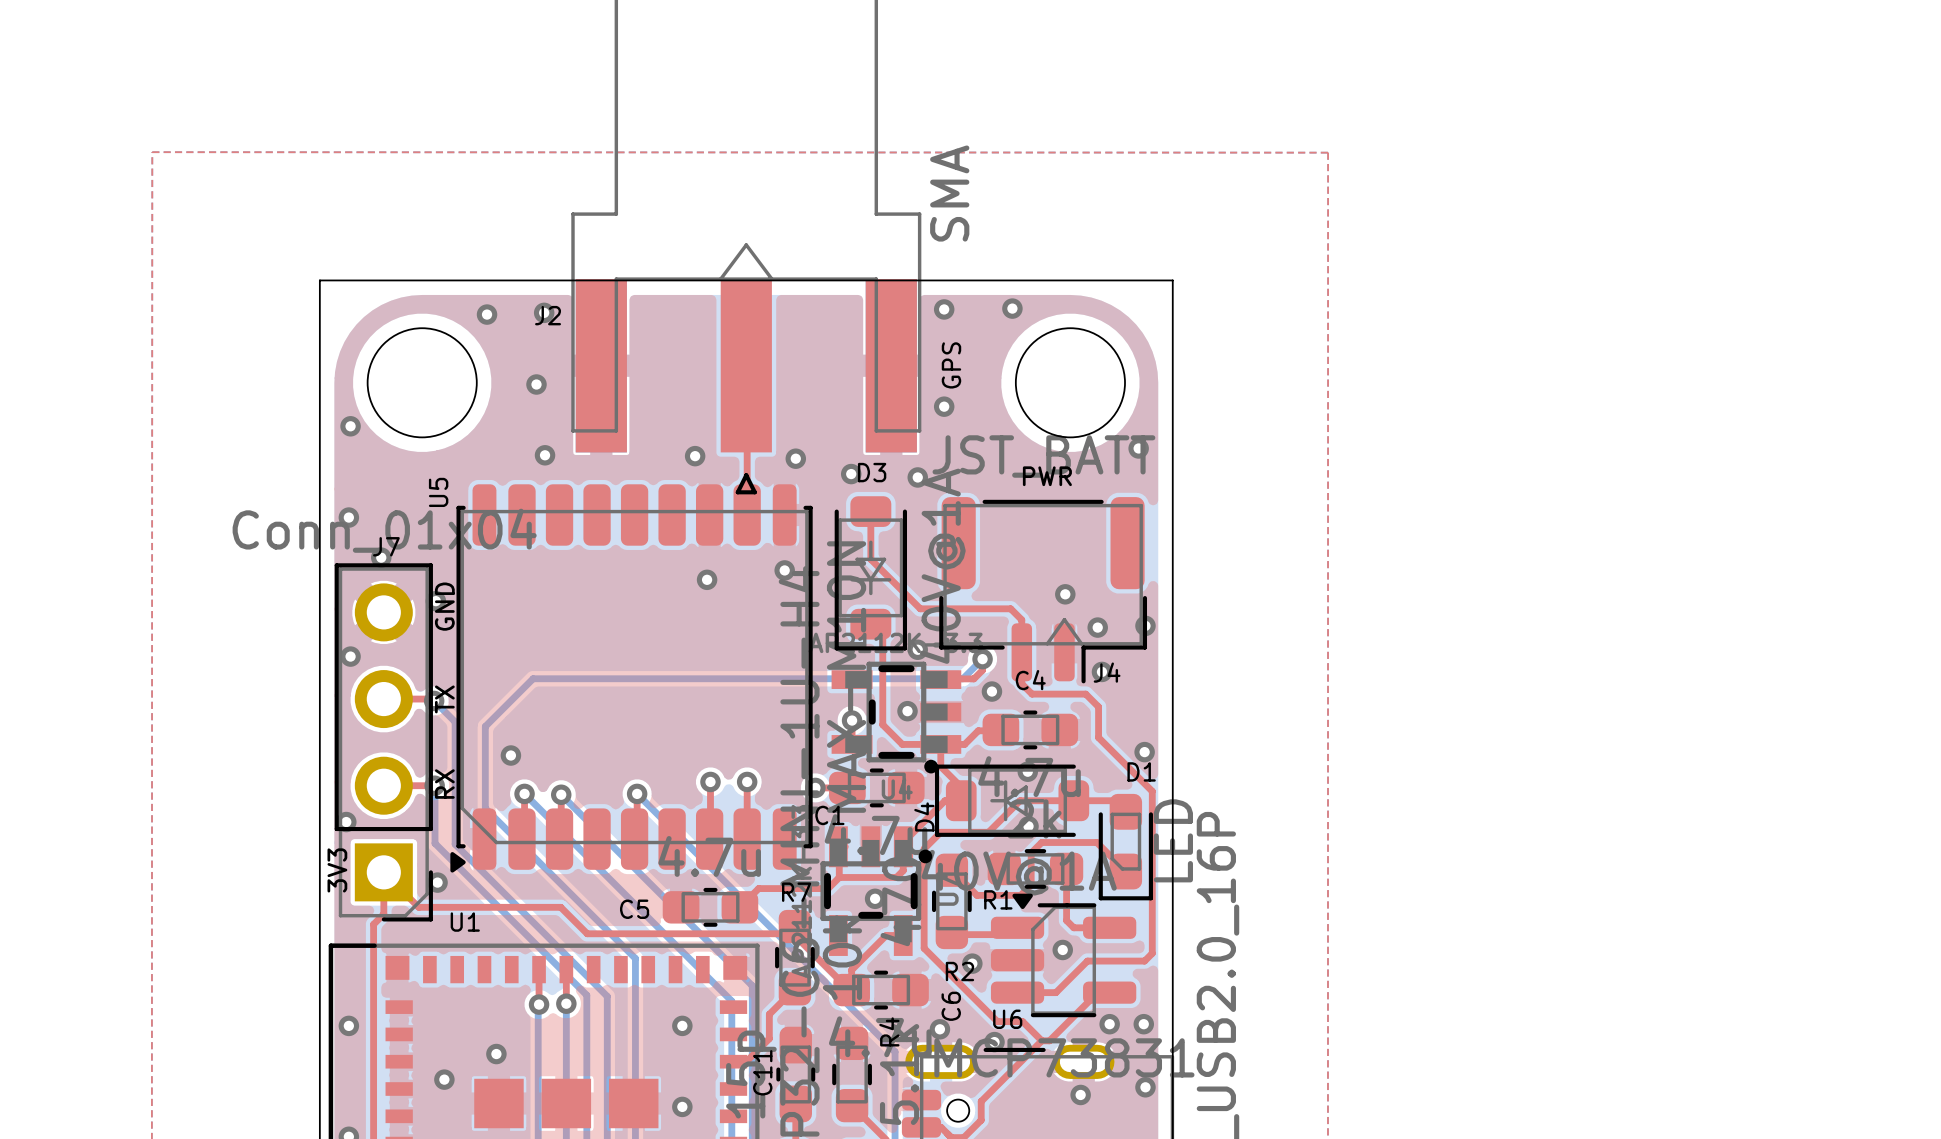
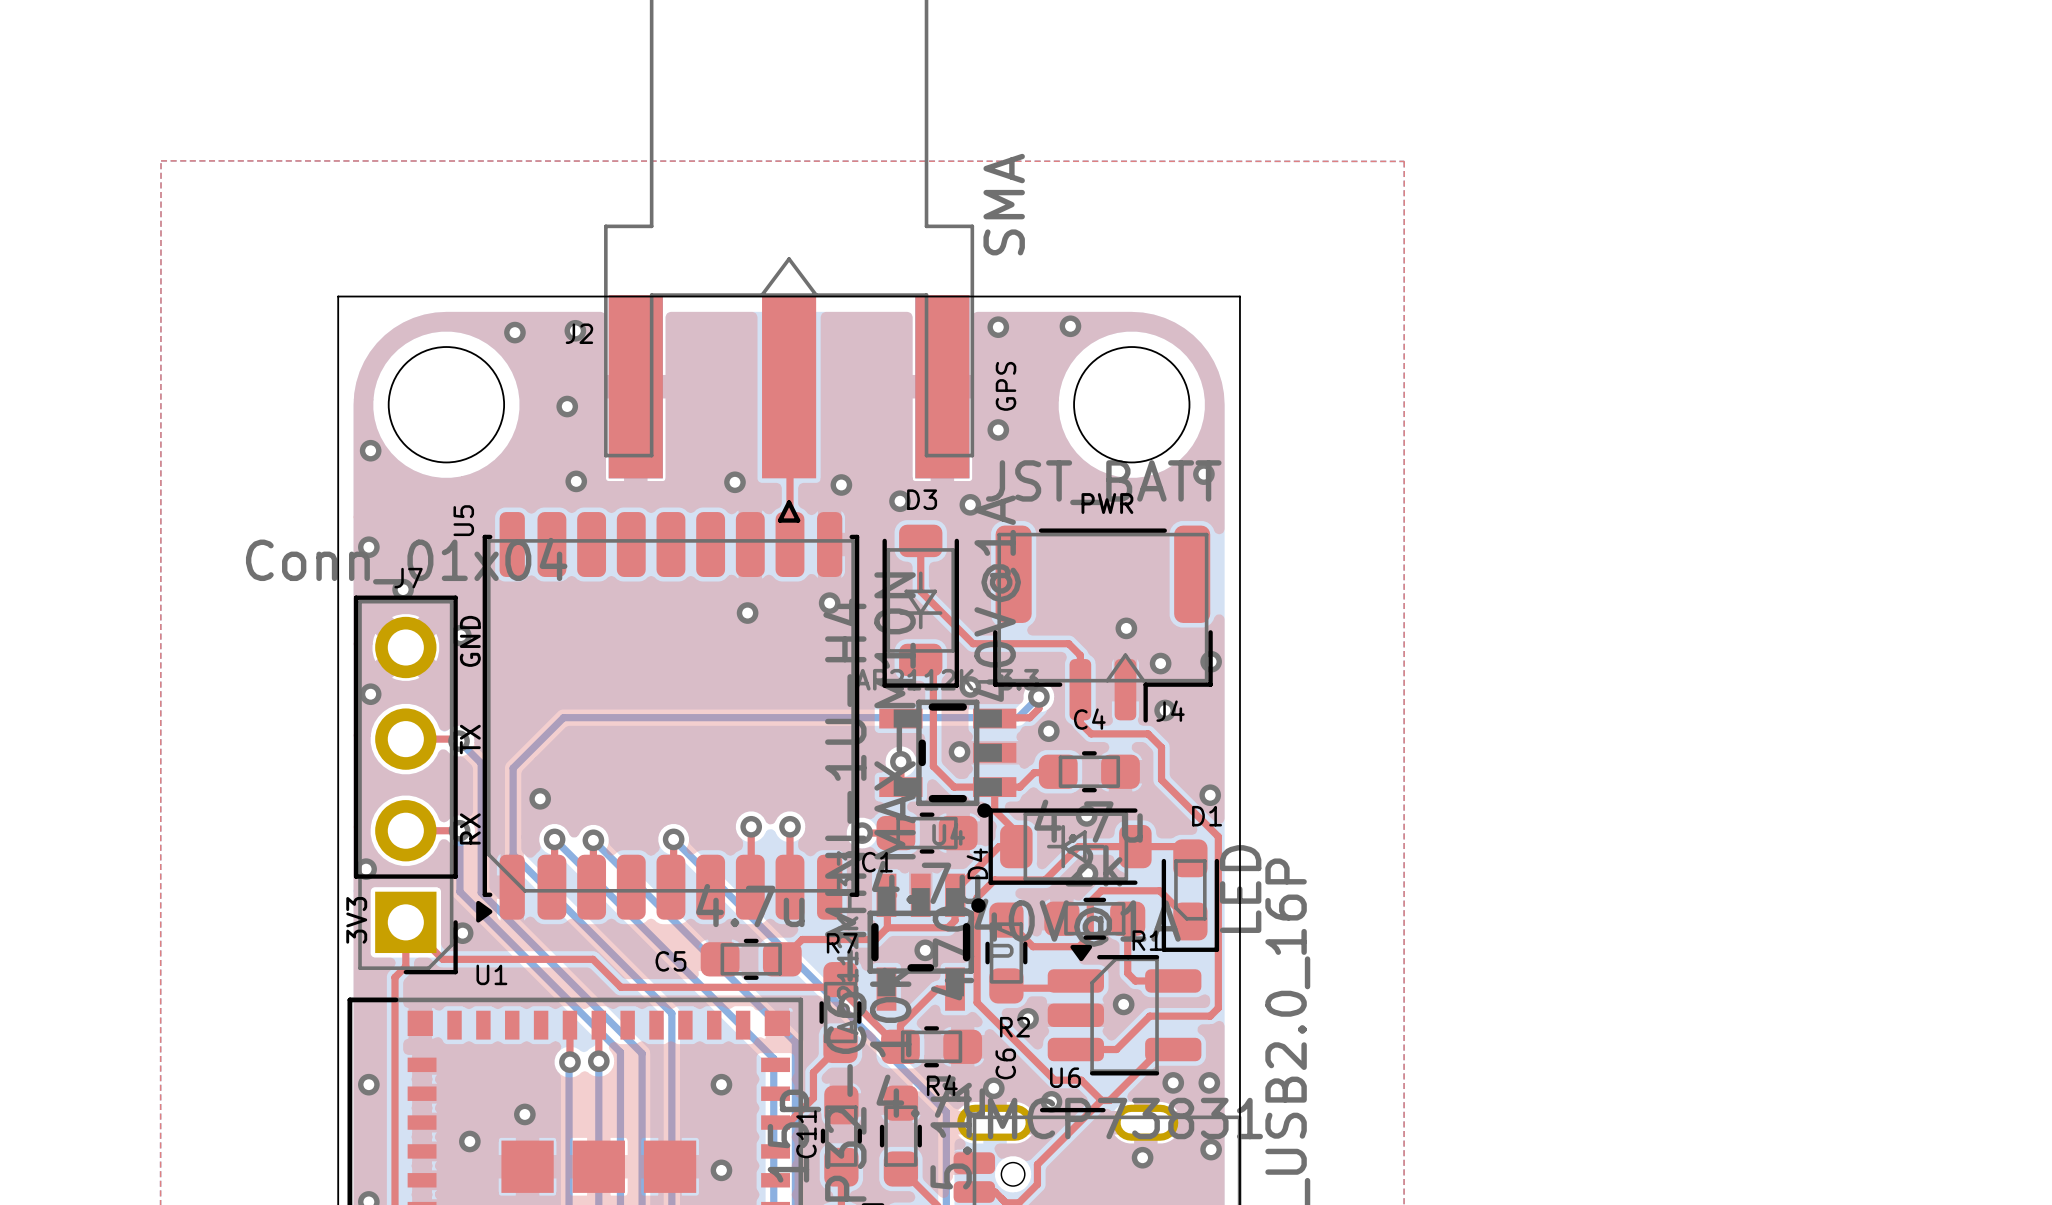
R1 name position: R1 (998, 899) -> R1 (1147, 940)
R4 name rotation: 0° (889, 1031) -> 90° clockwise (942, 1085)

